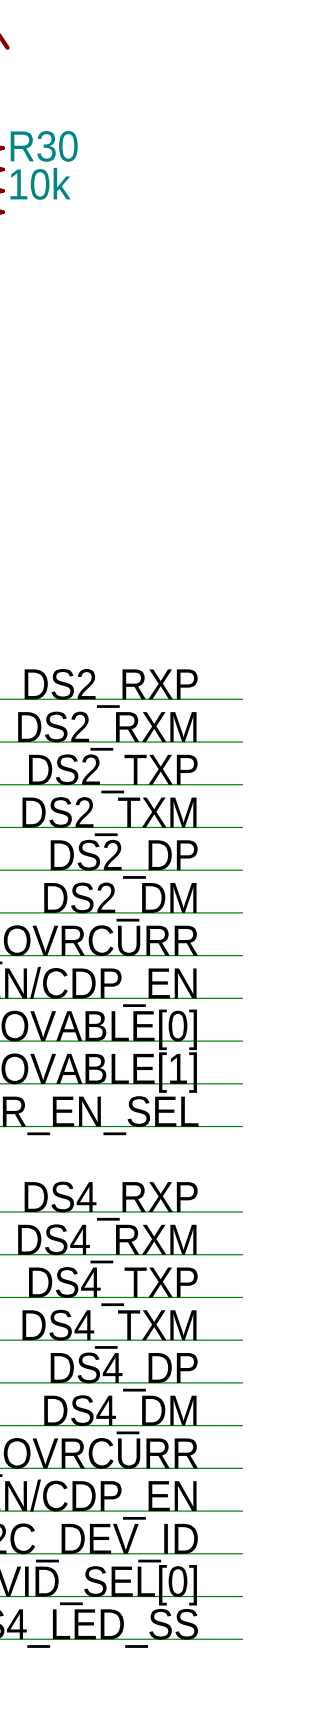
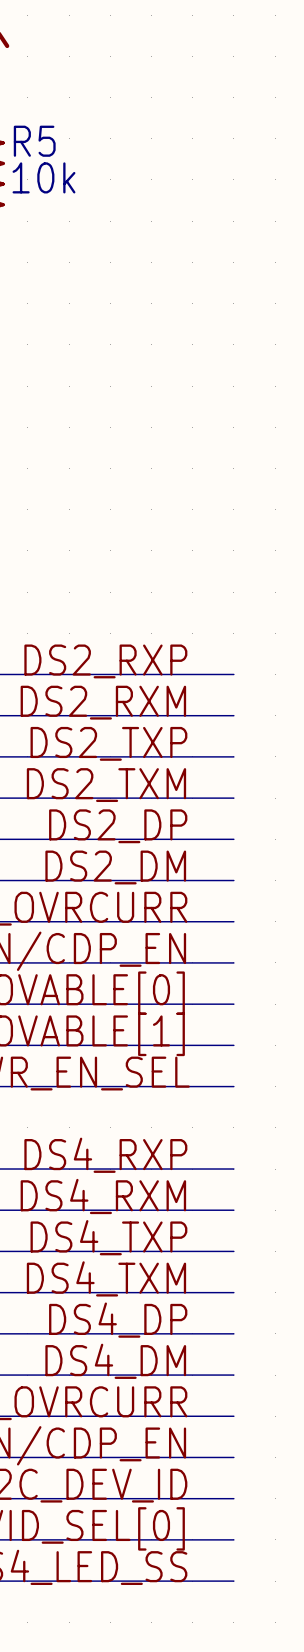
R30 name: R30 (44, 146) -> R5 (34, 141)

